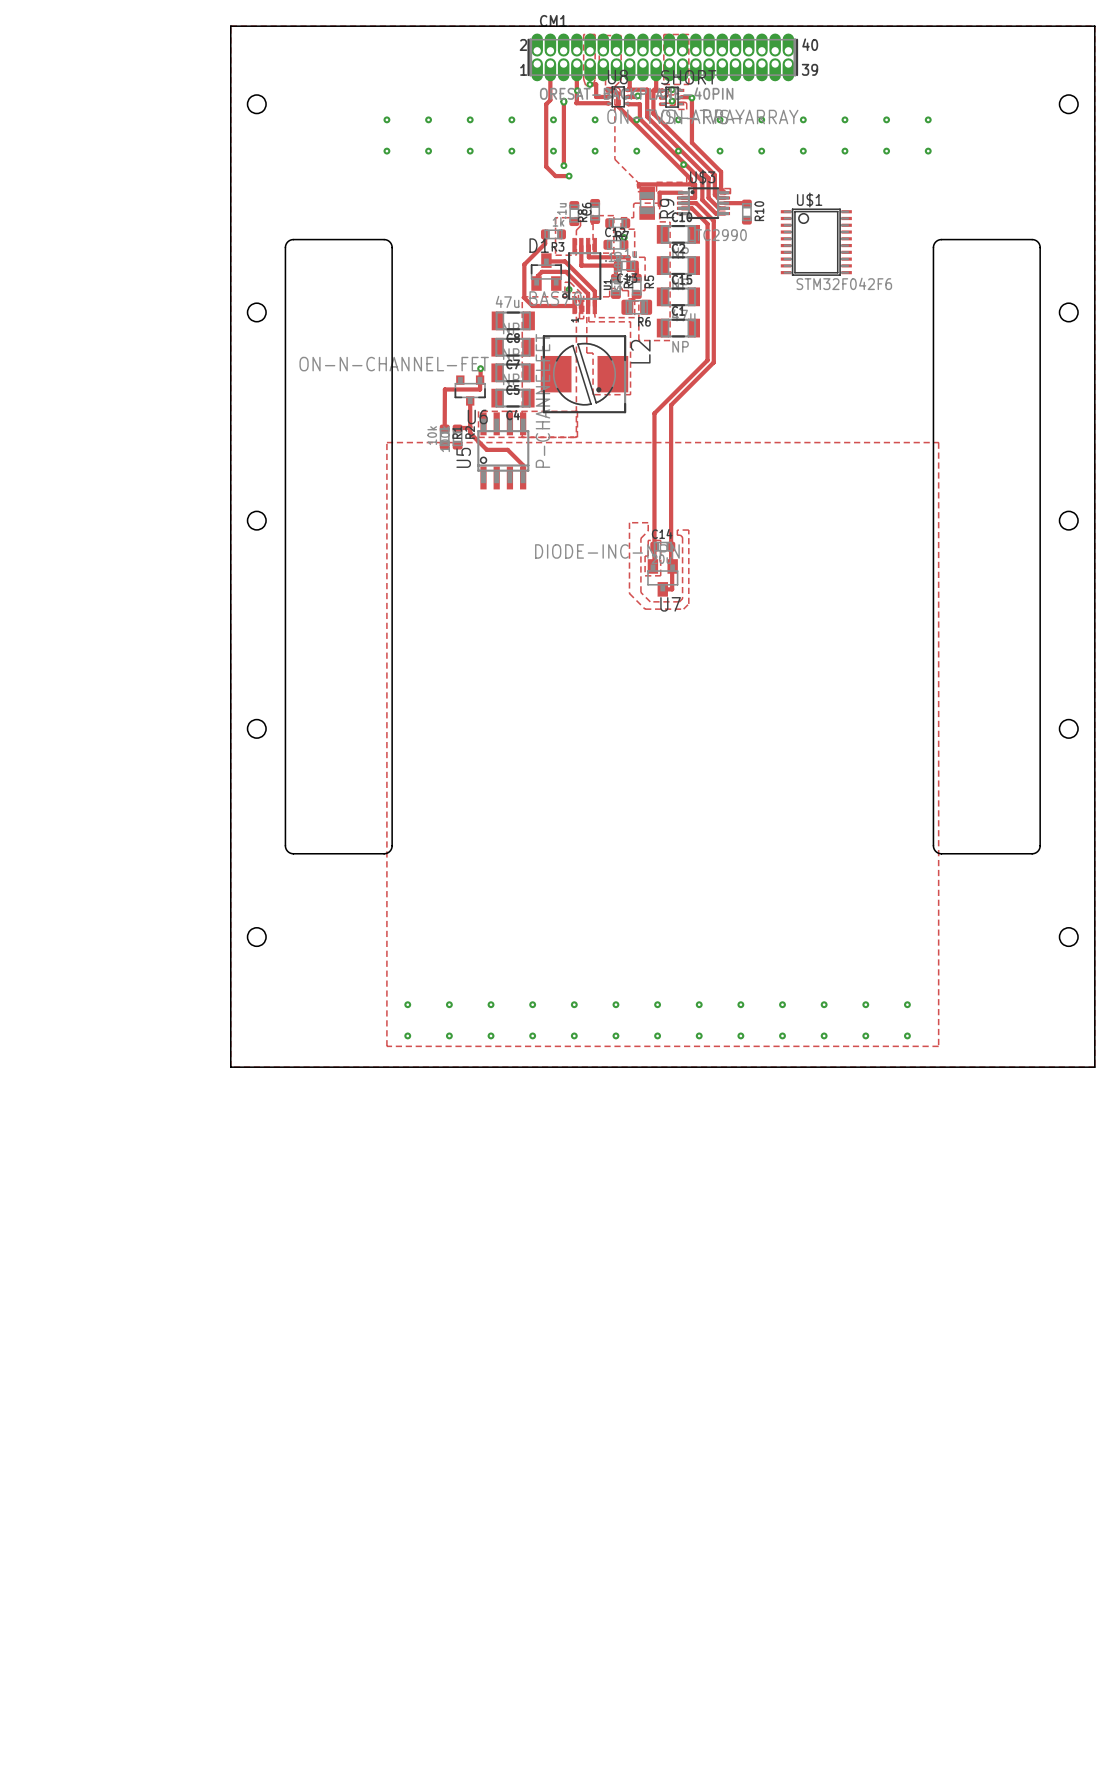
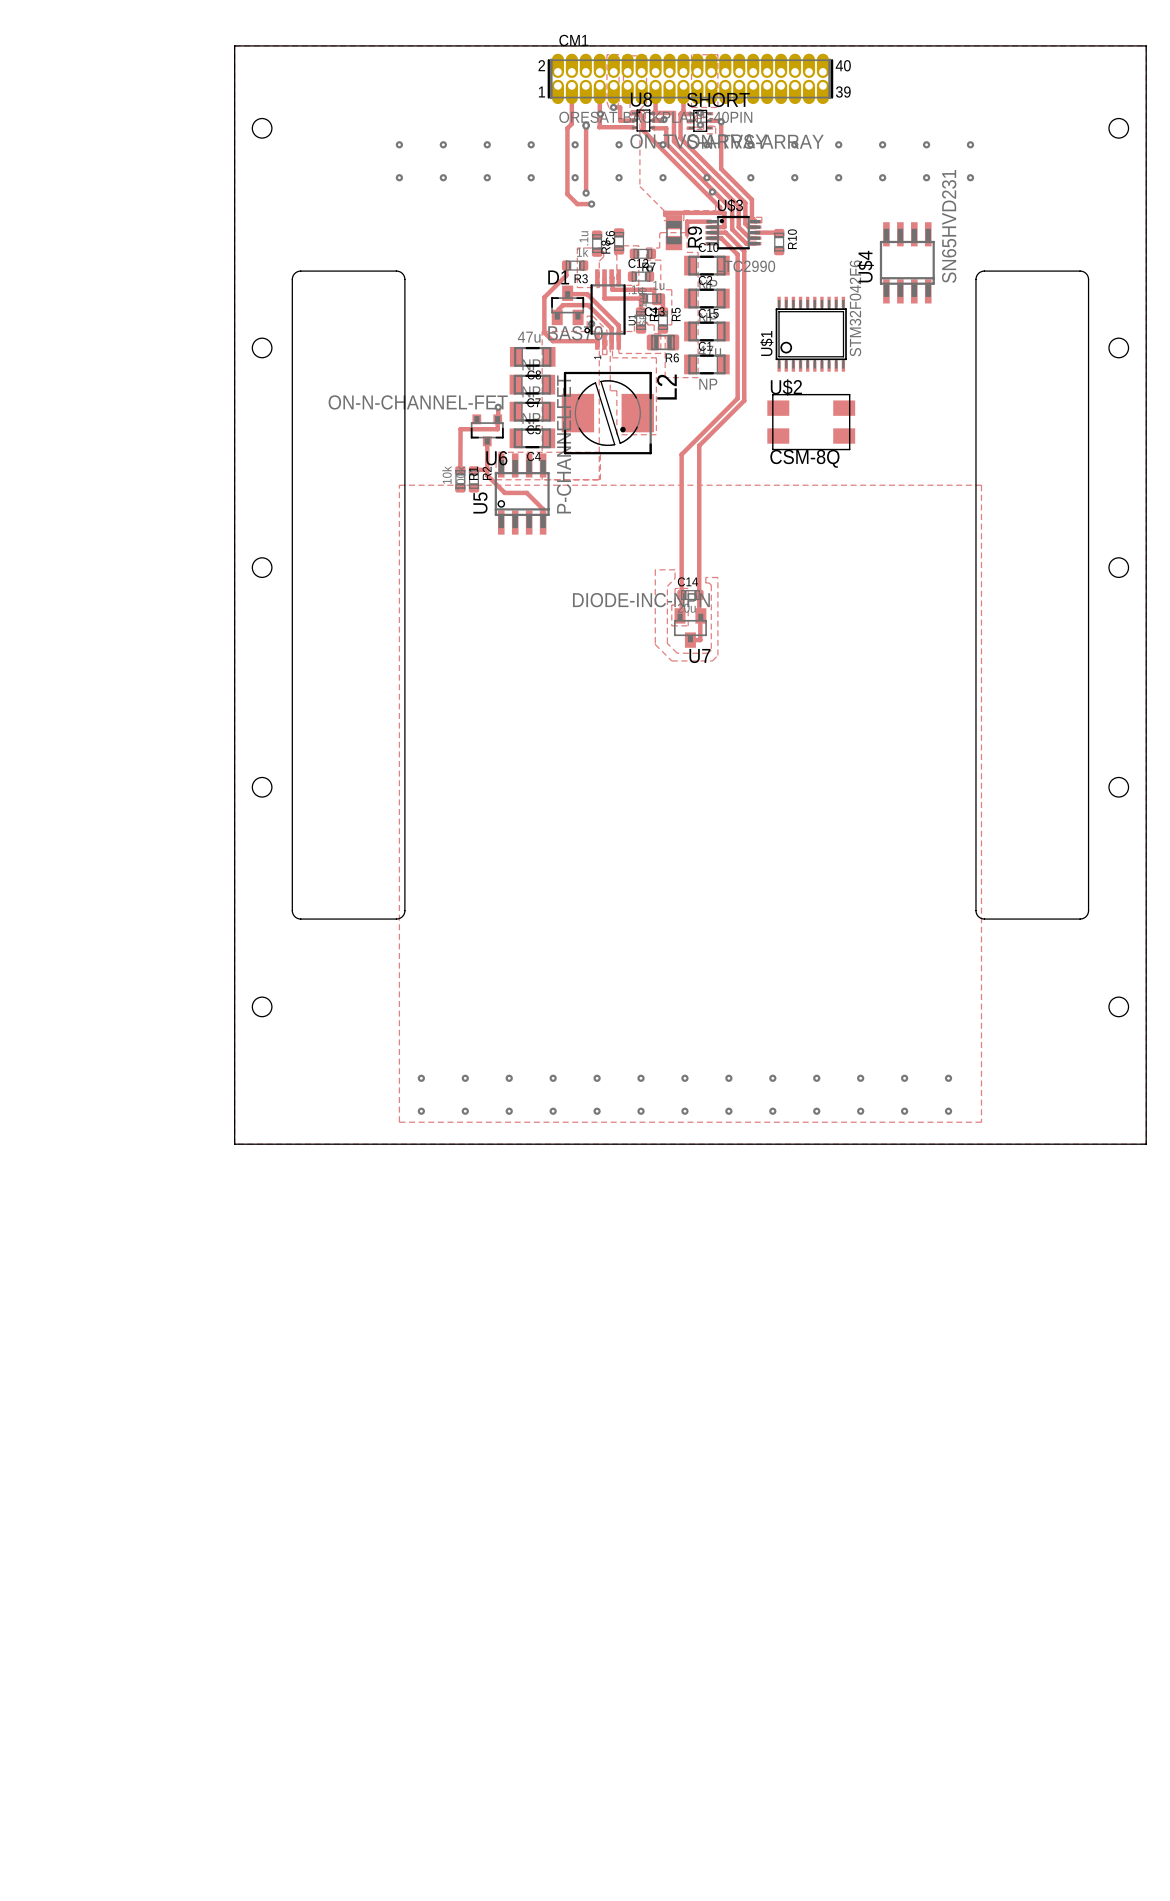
U$4: none -> SN65HVD231 (907, 262)
U$1 rotation: 0° (816, 242) -> 90° counterclockwise (811, 334)
U$1 position: (816, 242) -> (811, 334)
U$2: none -> CSM-8Q (811, 422)

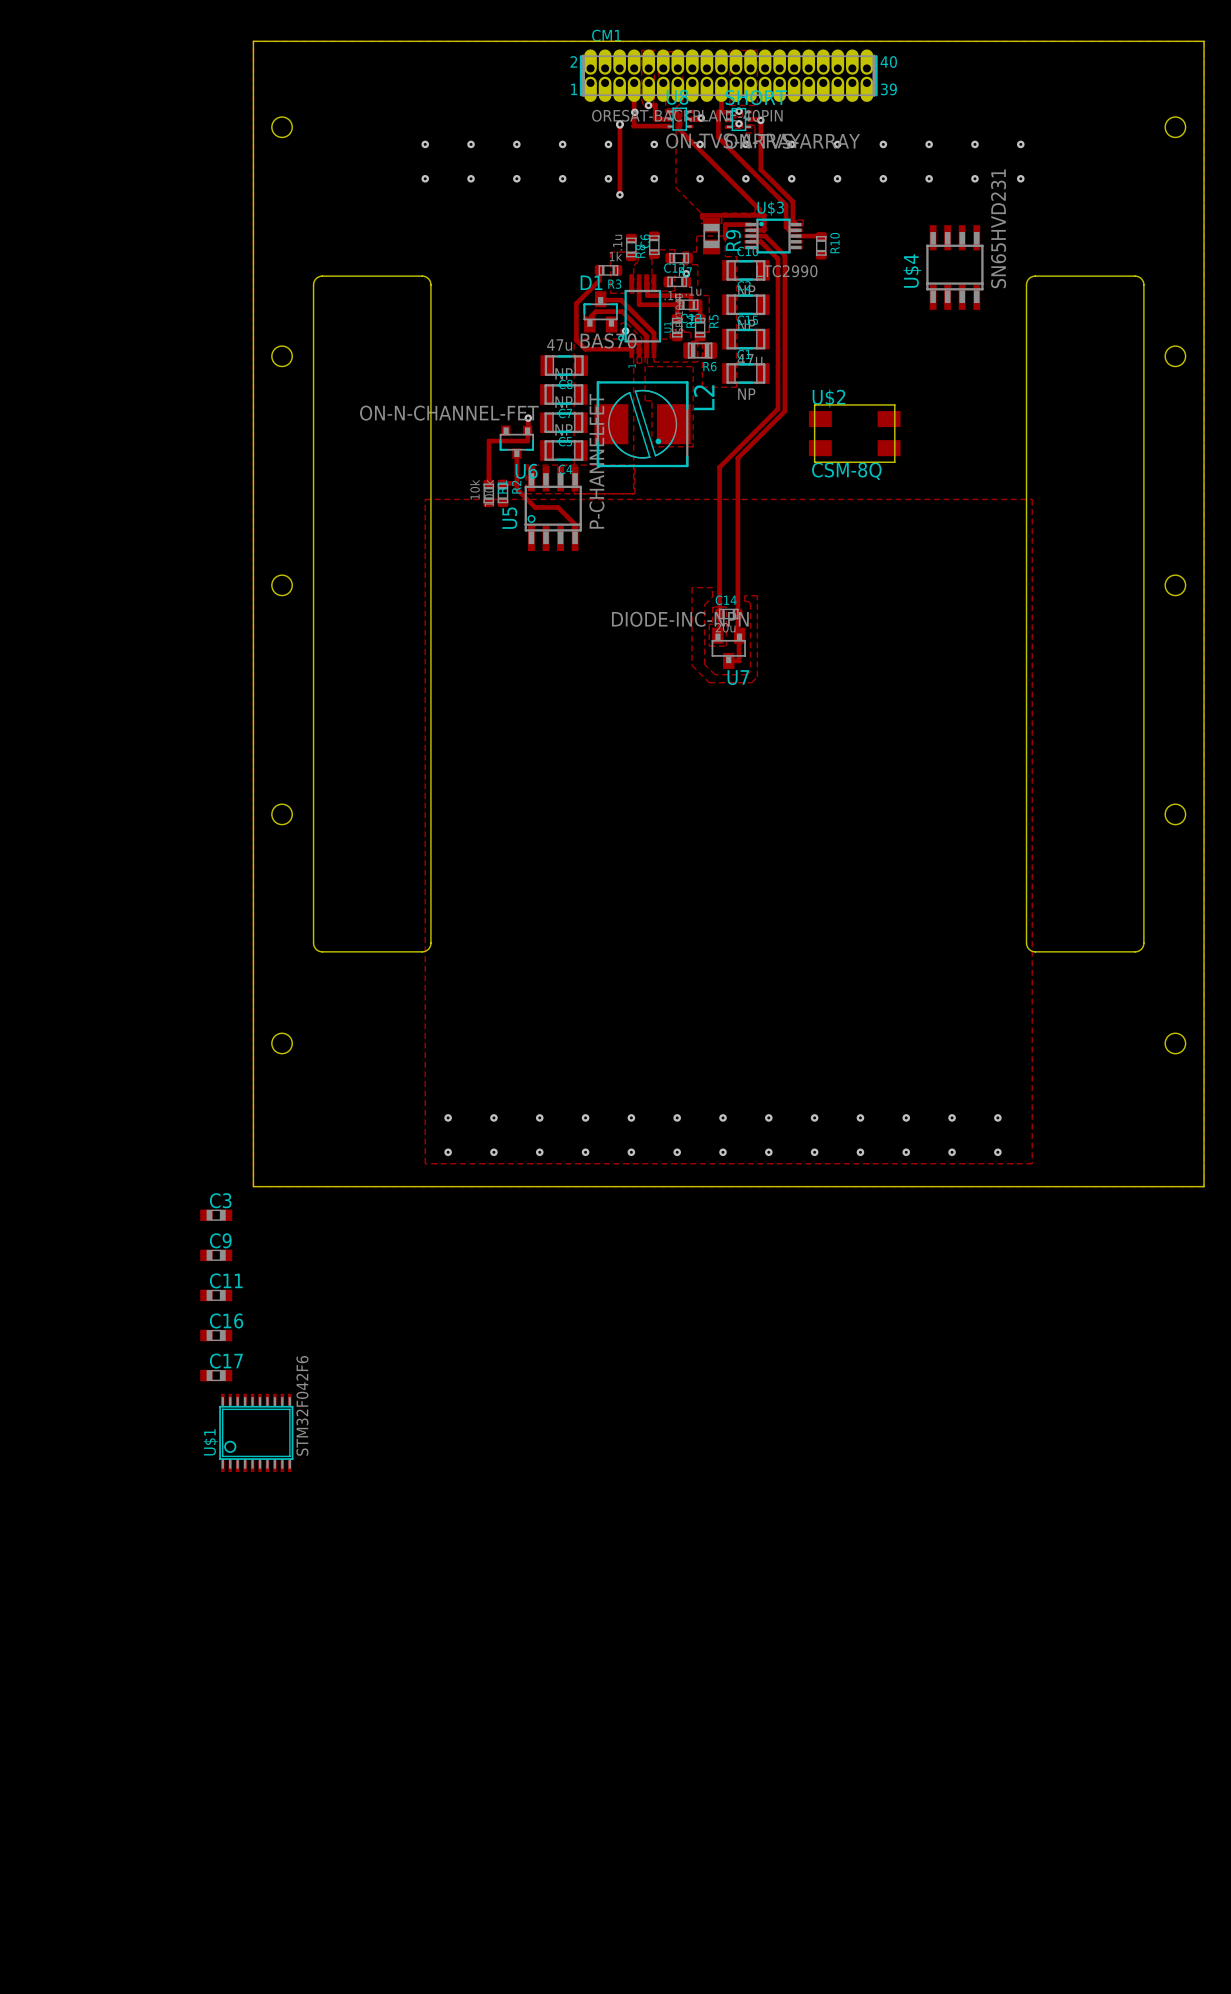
track: (571, 85) (571, 123) (567, 128) (567, 194) (577, 204) (591, 204) -> none
track: (655, 85) (655, 111) (653, 113) (673, 112) (673, 141) (738, 206) (738, 227) (749, 238) (755, 238) -> none
track: (653, 127) (666, 128) (666, 143) (732, 209) (732, 229) (746, 243) (755, 243) -> none
via: (712, 192) -> none
via: (591, 204) -> none
U$1 position: (811, 334) -> (256, 1432)
C3: none -> (216, 1215)
C9: none -> (216, 1255)
C11: none -> (216, 1295)
C16: none -> (216, 1335)
C17: none -> (216, 1375)

